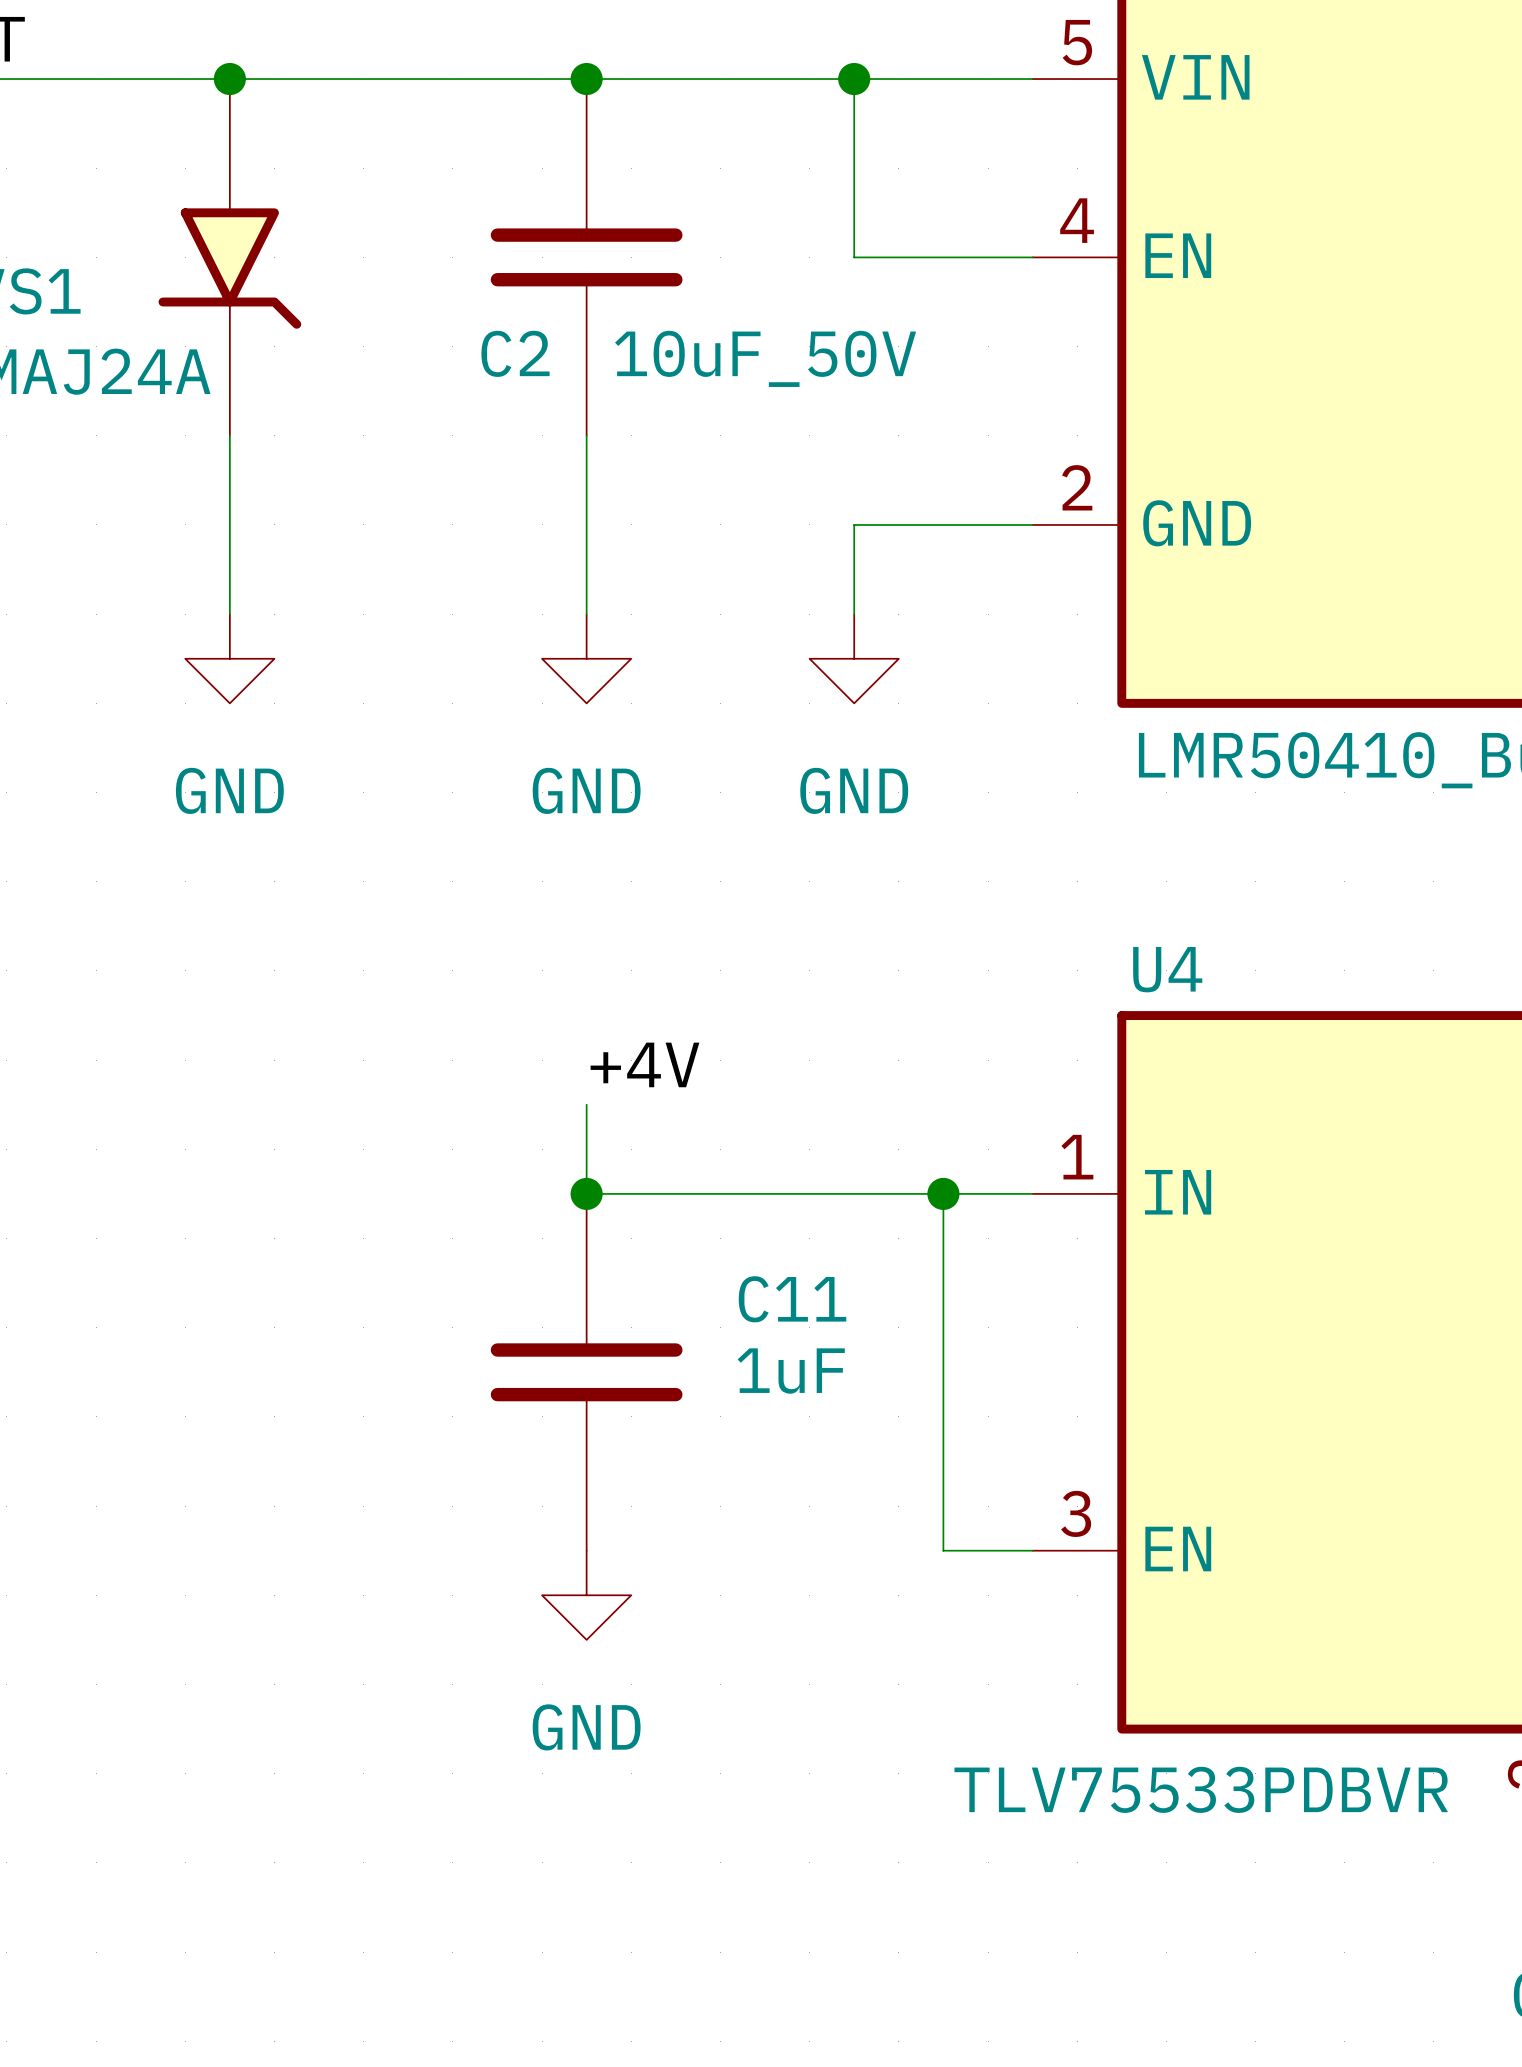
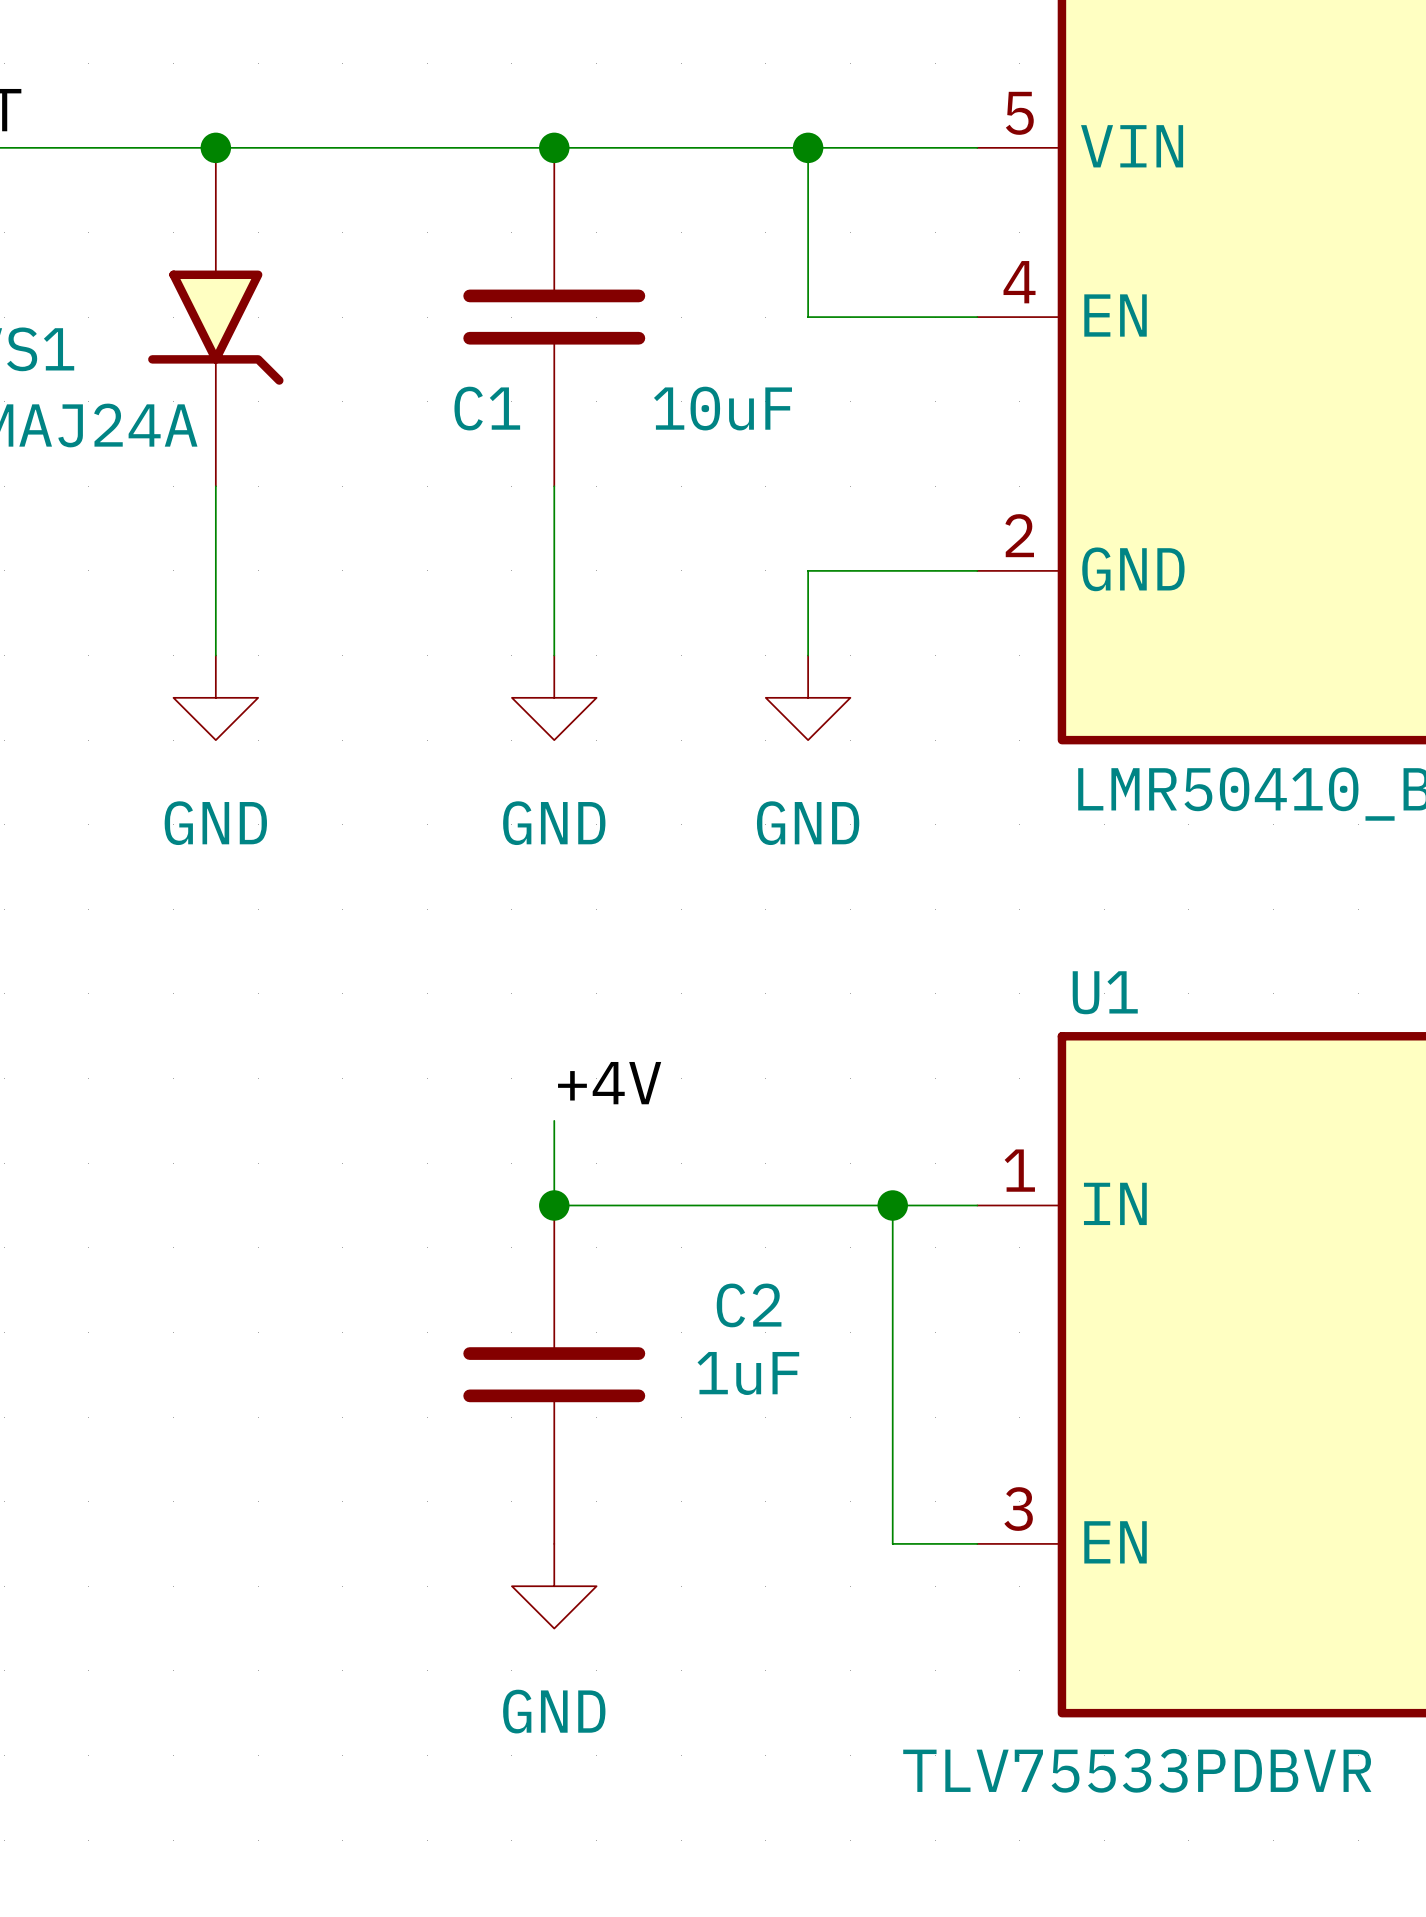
C2 name: C2 (515, 353) -> C1 (487, 408)
C2 value: 10uF_50V (765, 358) -> 10uF (722, 408)
U4 name: U4 (1167, 969) -> U1 (1105, 992)
C11 name: C11 (792, 1299) -> C2 (749, 1305)

